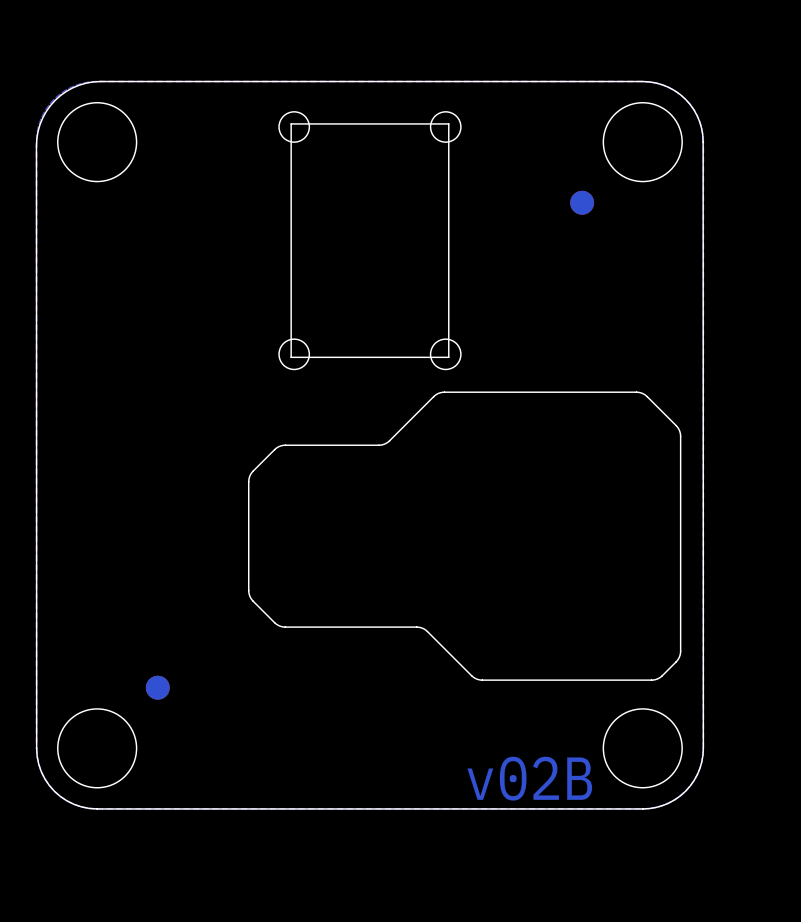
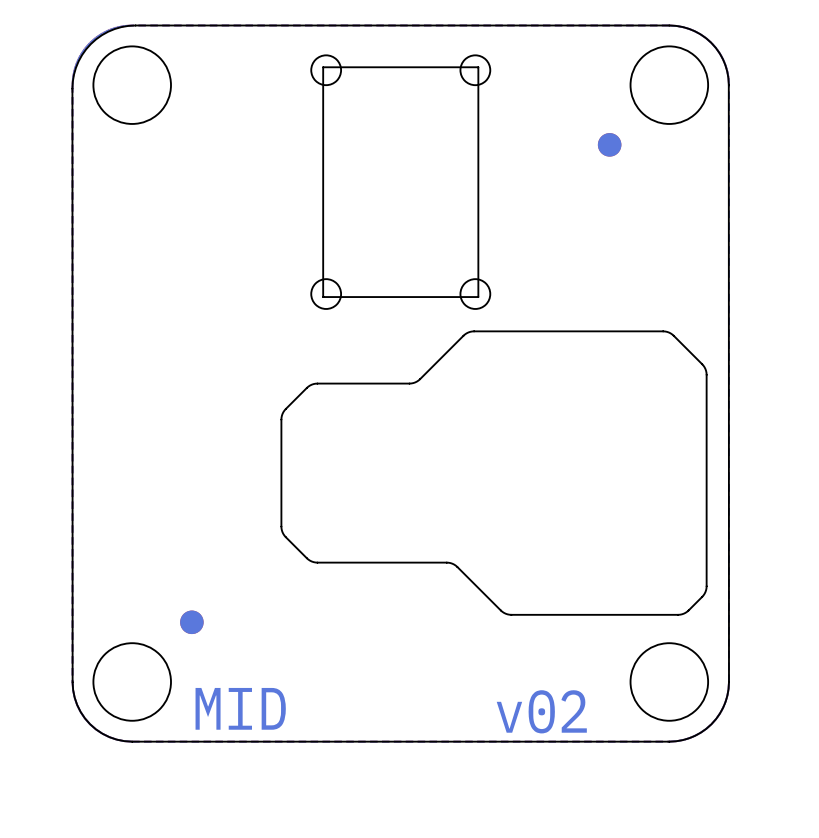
text: none -> MID (240, 708)
text: v02B (529, 778) -> v02 (541, 711)

